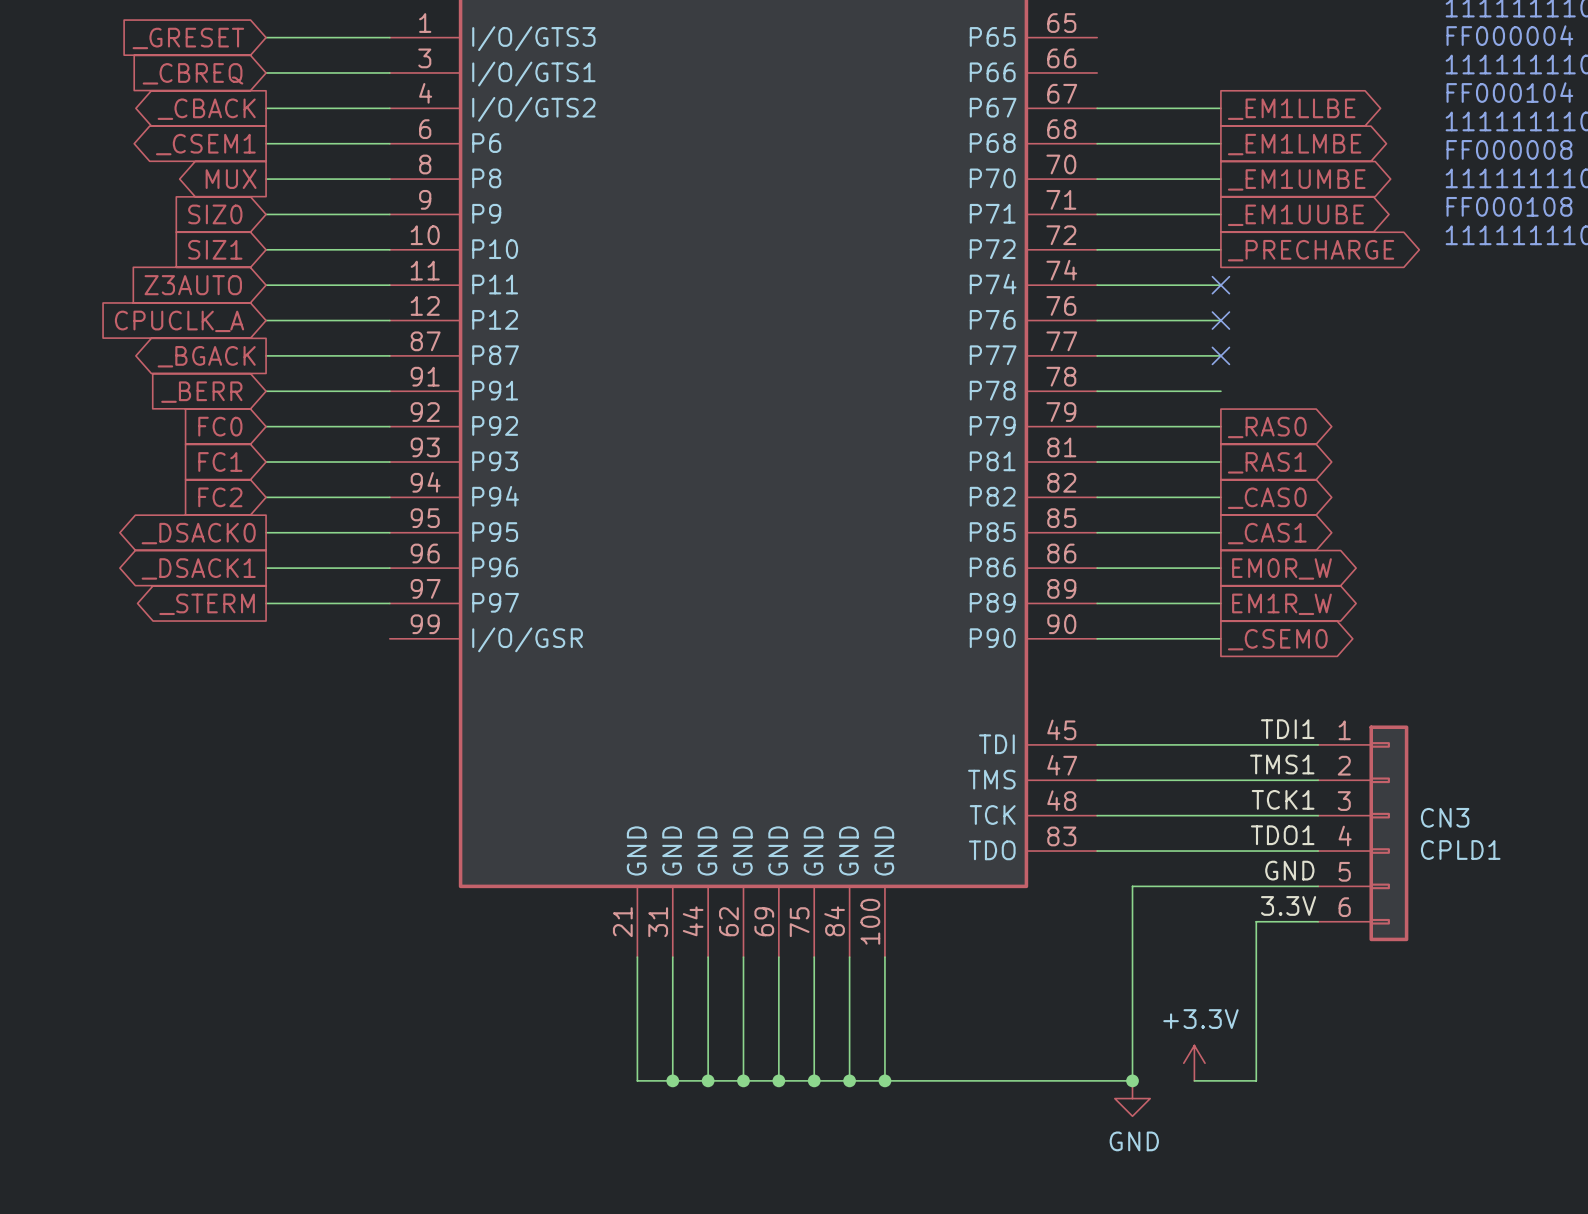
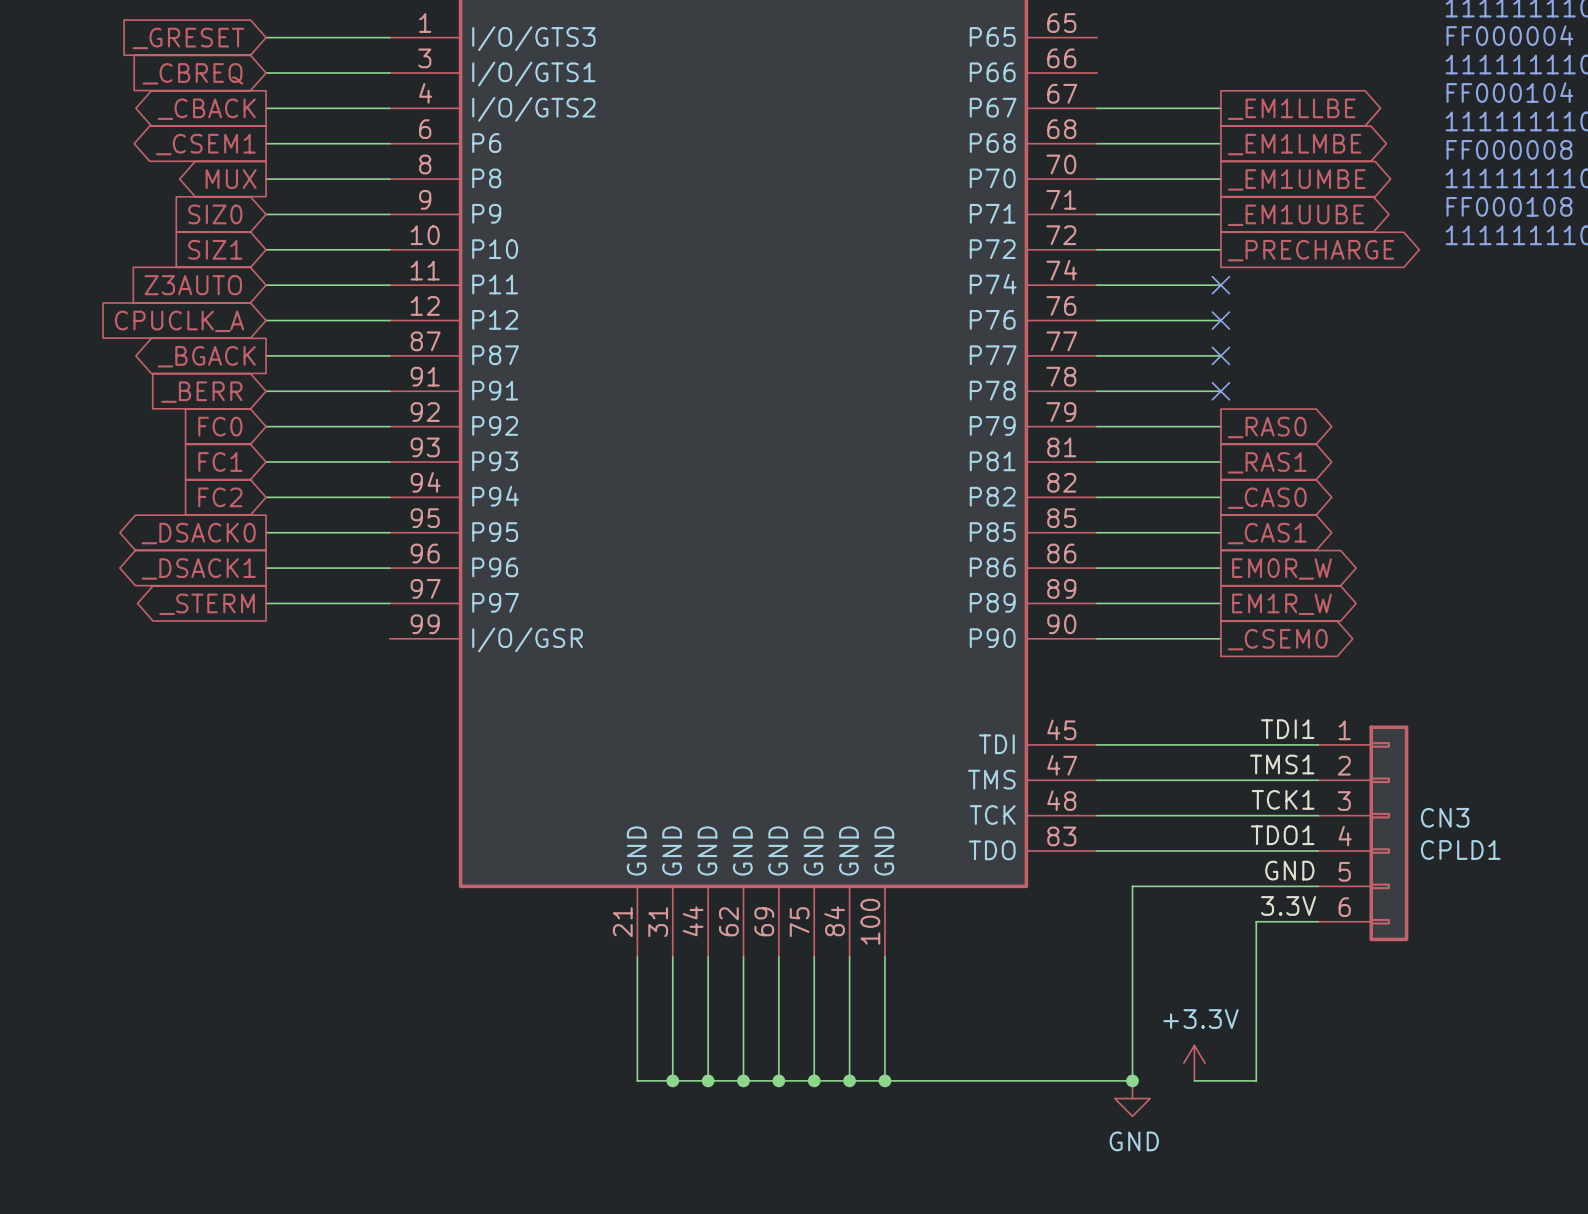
no-connect mark: none -> (1220, 391)

